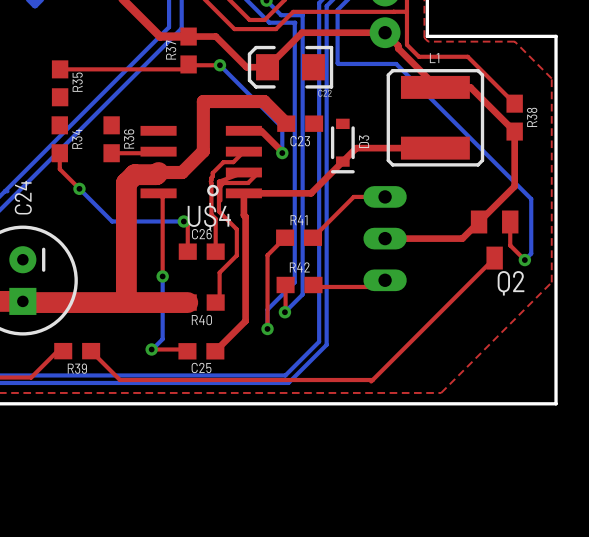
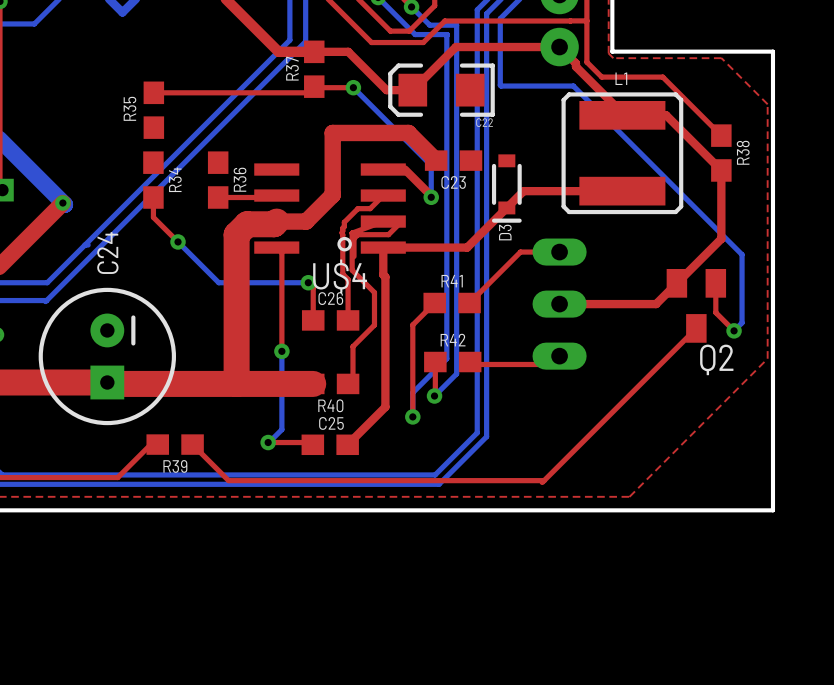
R35 name position: R35 (77, 82) -> R35 (129, 108)
D3 name position: D3 (364, 141) -> D3 (505, 232)
C25 name position: C25 (201, 367) -> C25 (331, 423)

